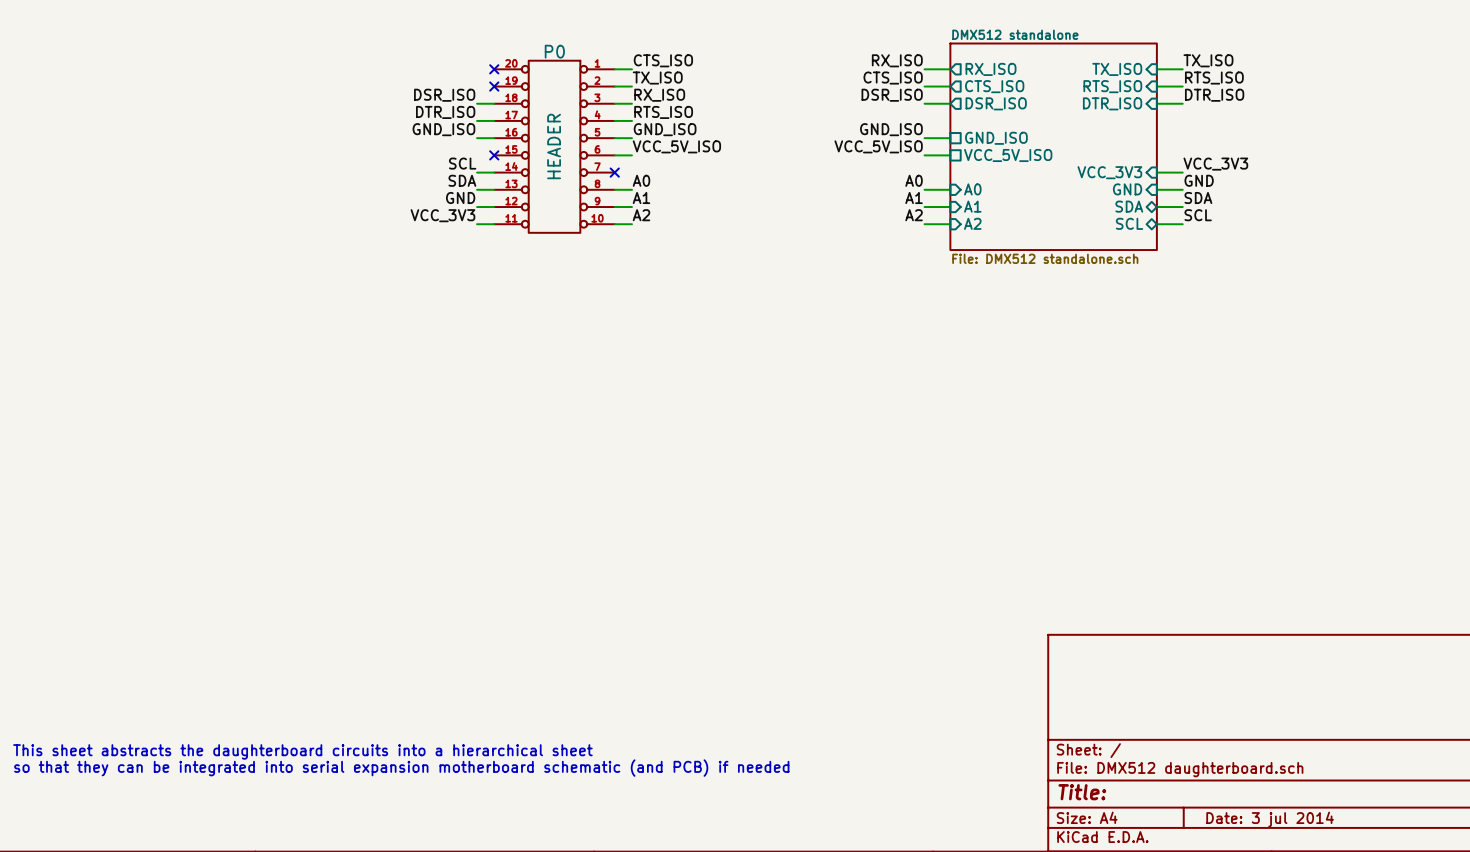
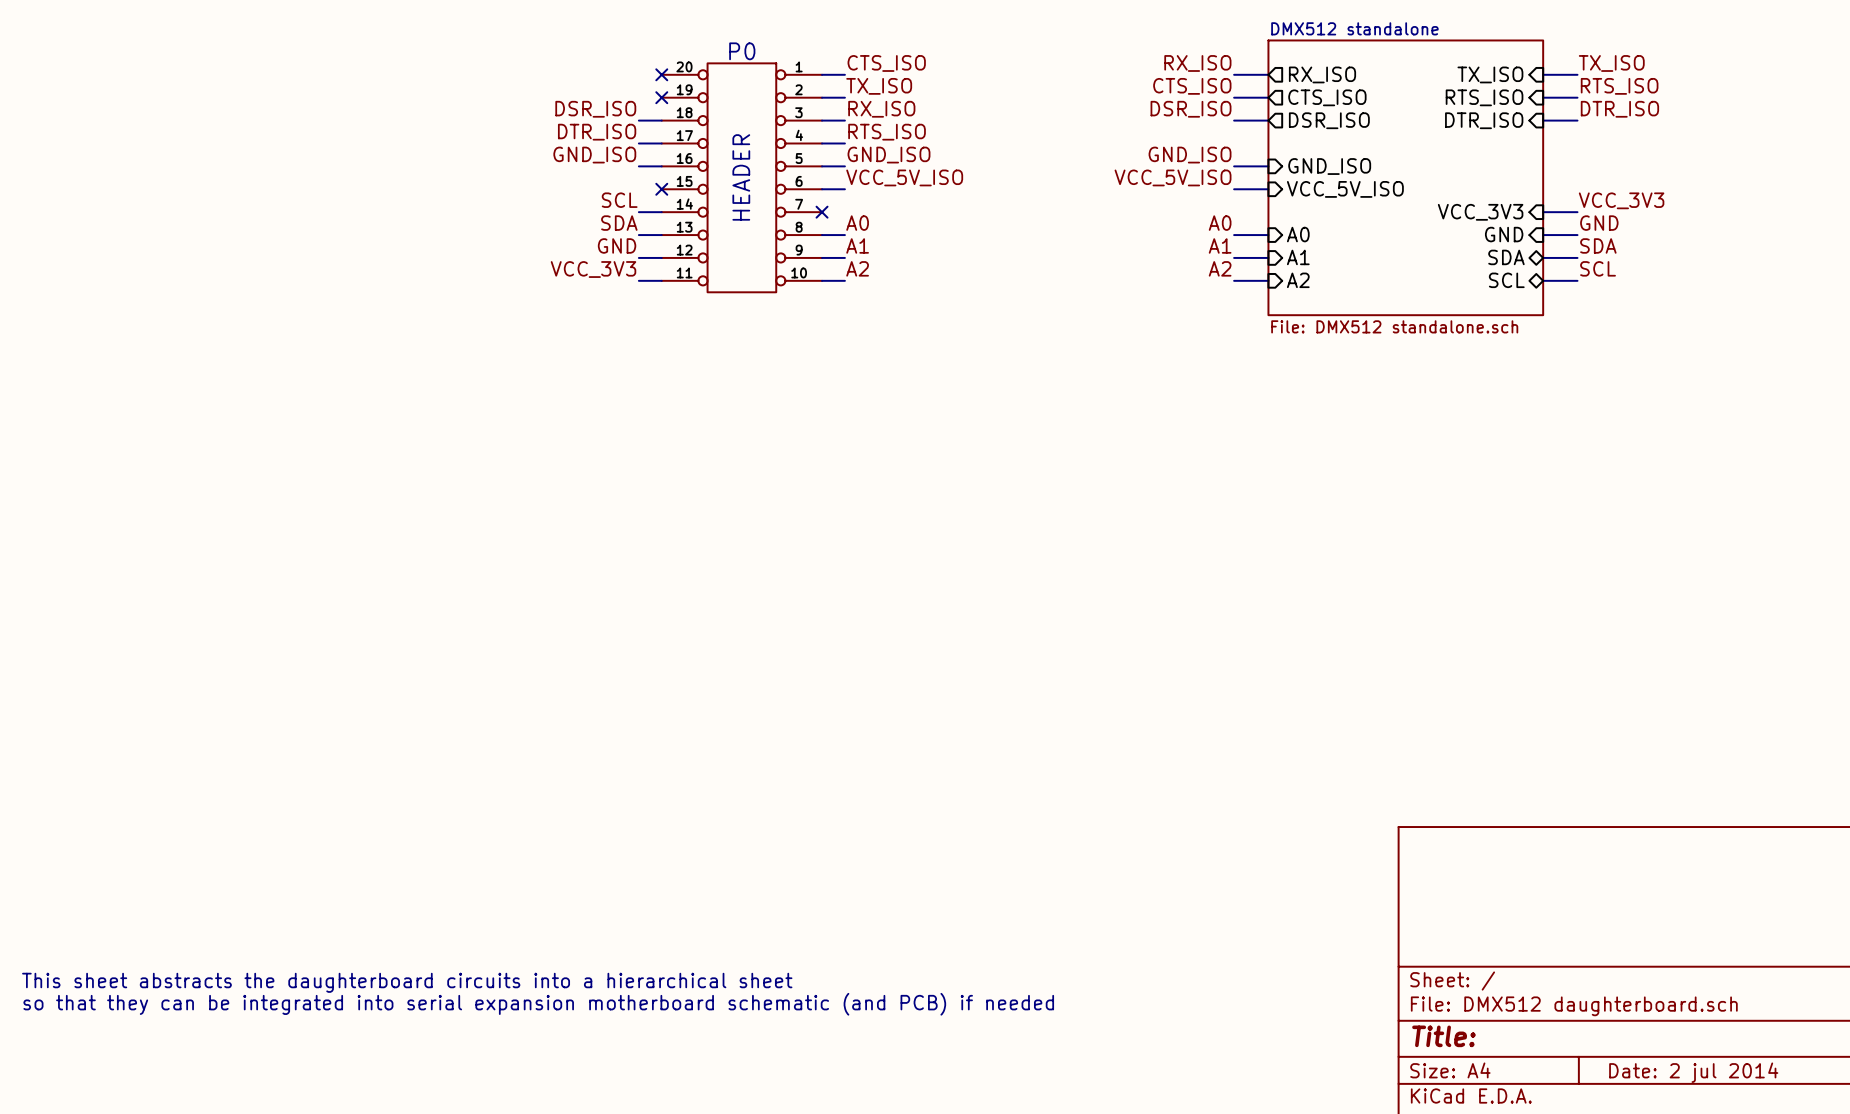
sheet pin shape: passive (996, 138) -> input (1329, 166)
sheet pin shape: passive (1008, 155) -> input (1345, 189)
title block: Date: 3 jul 2014 (1270, 819) -> Date: 2 jul 2014 (1693, 1072)

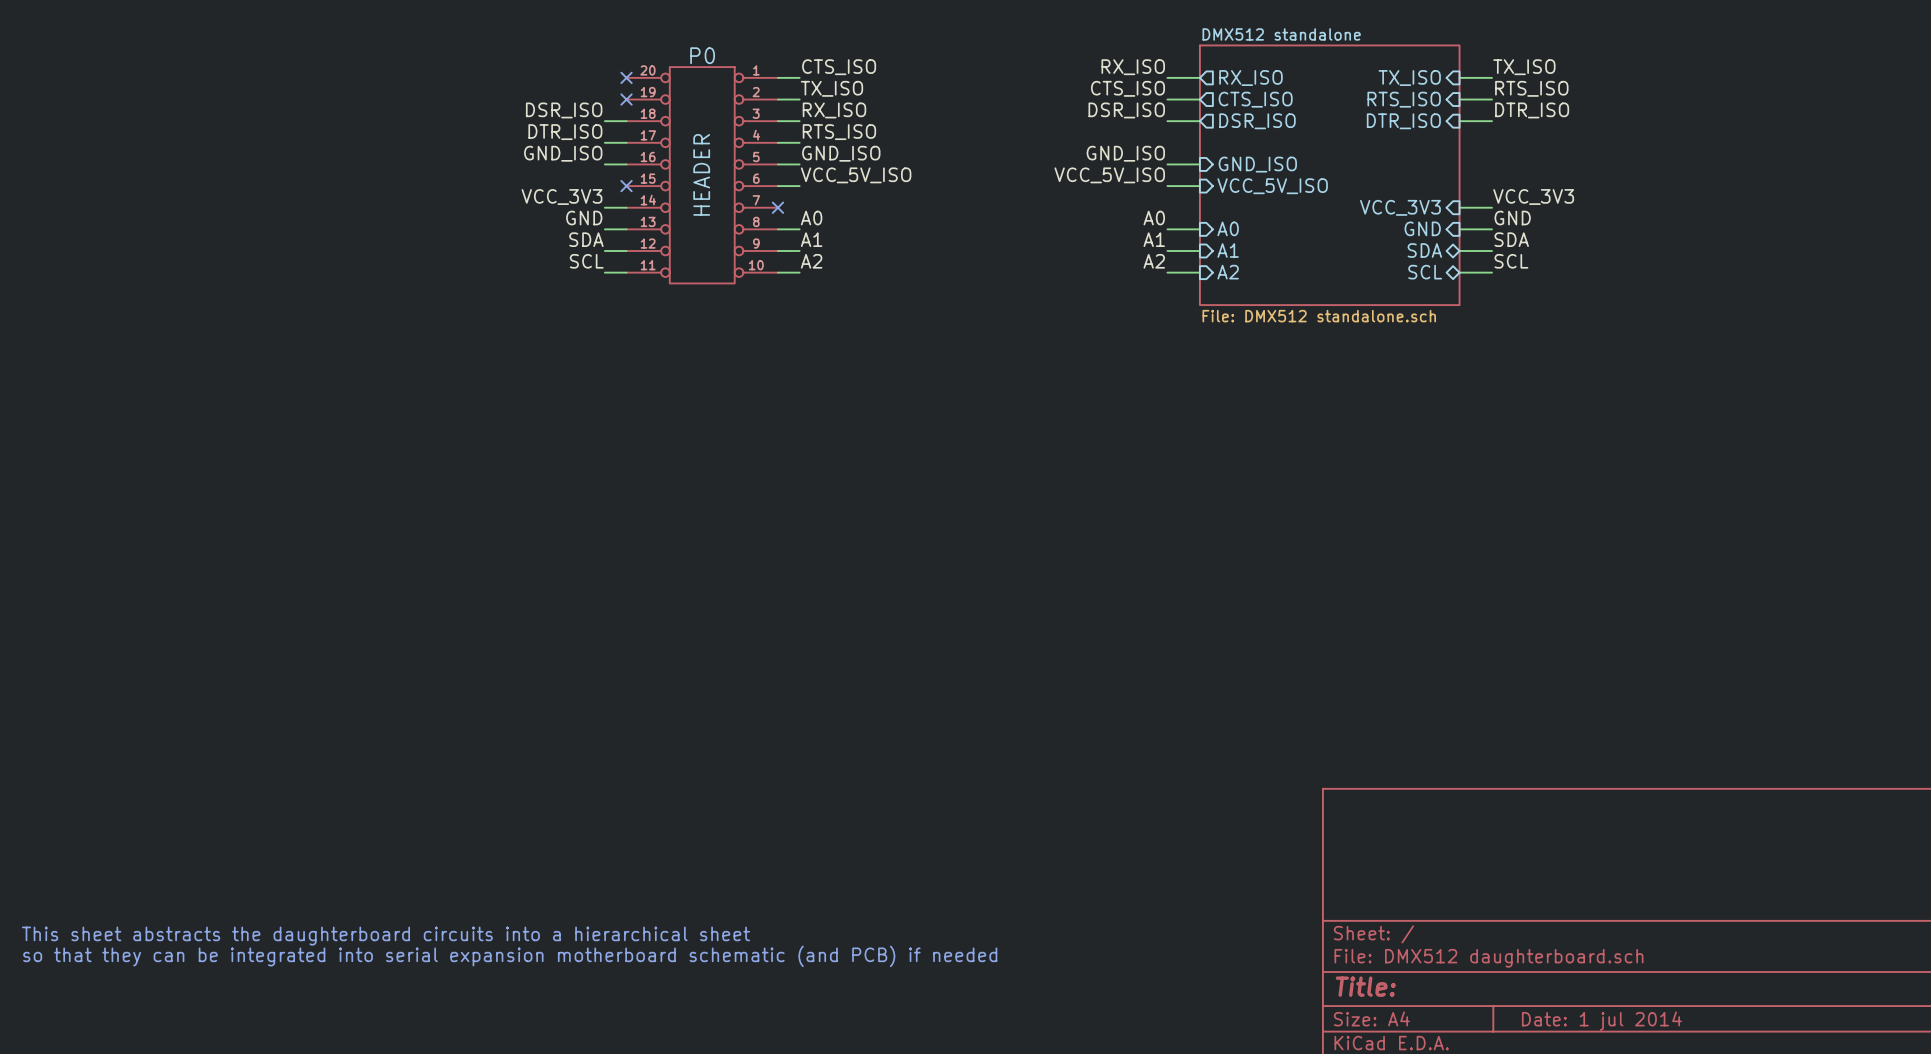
label: SCL (619, 200) -> VCC_3V3 (562, 197)
label: SDA (619, 223) -> GND (584, 218)
label: GND (617, 245) -> SDA (586, 239)
label: VCC_3V3 (593, 269) -> SCL (586, 261)
title block: Date: 2 jul 2014 (1693, 1072) -> Date: 1 jul 2014 (1601, 1021)

